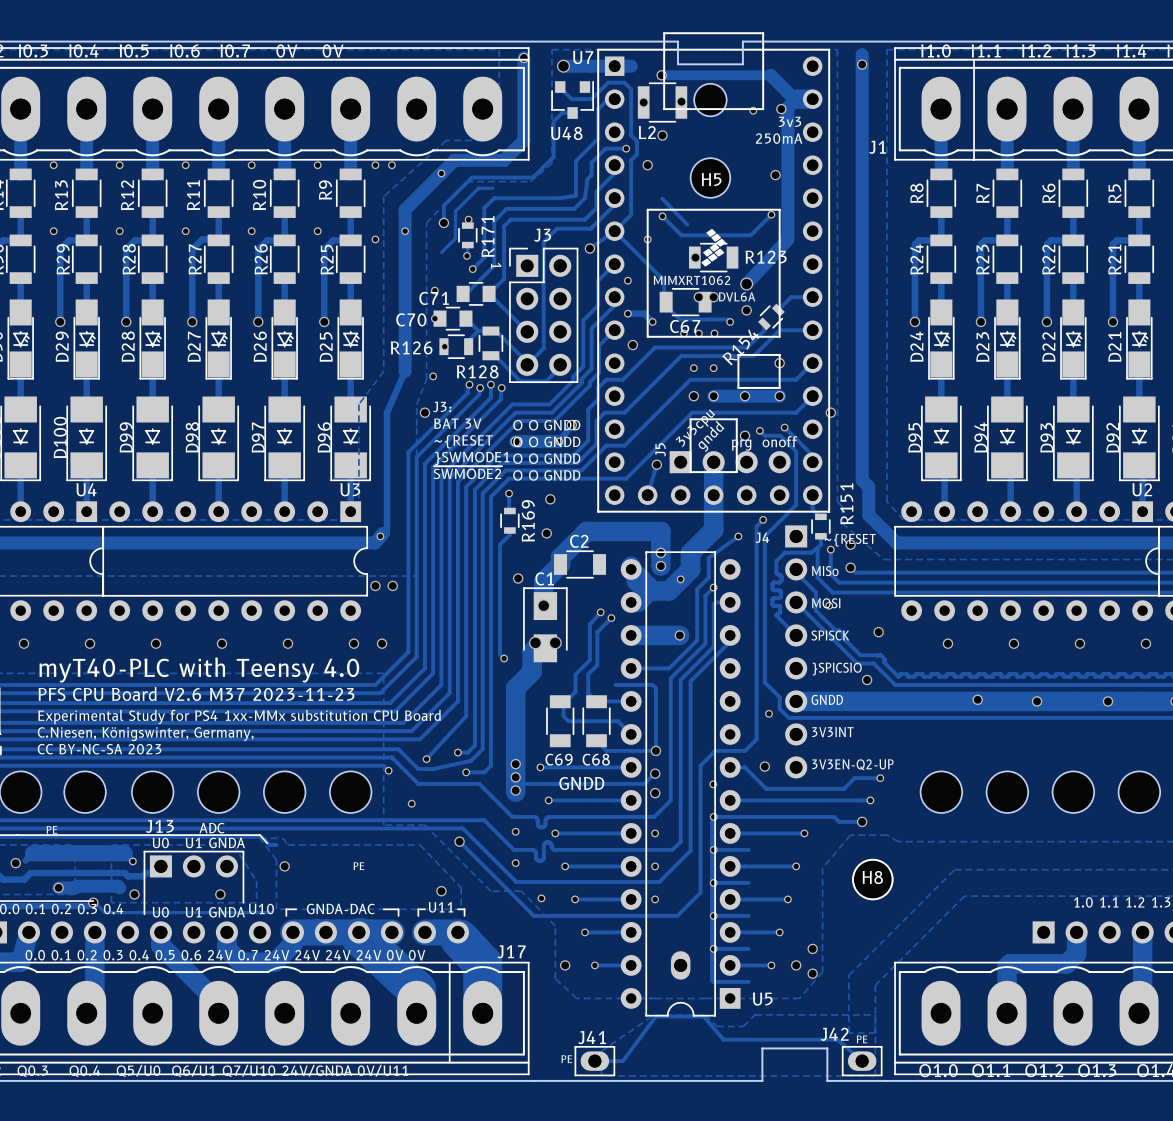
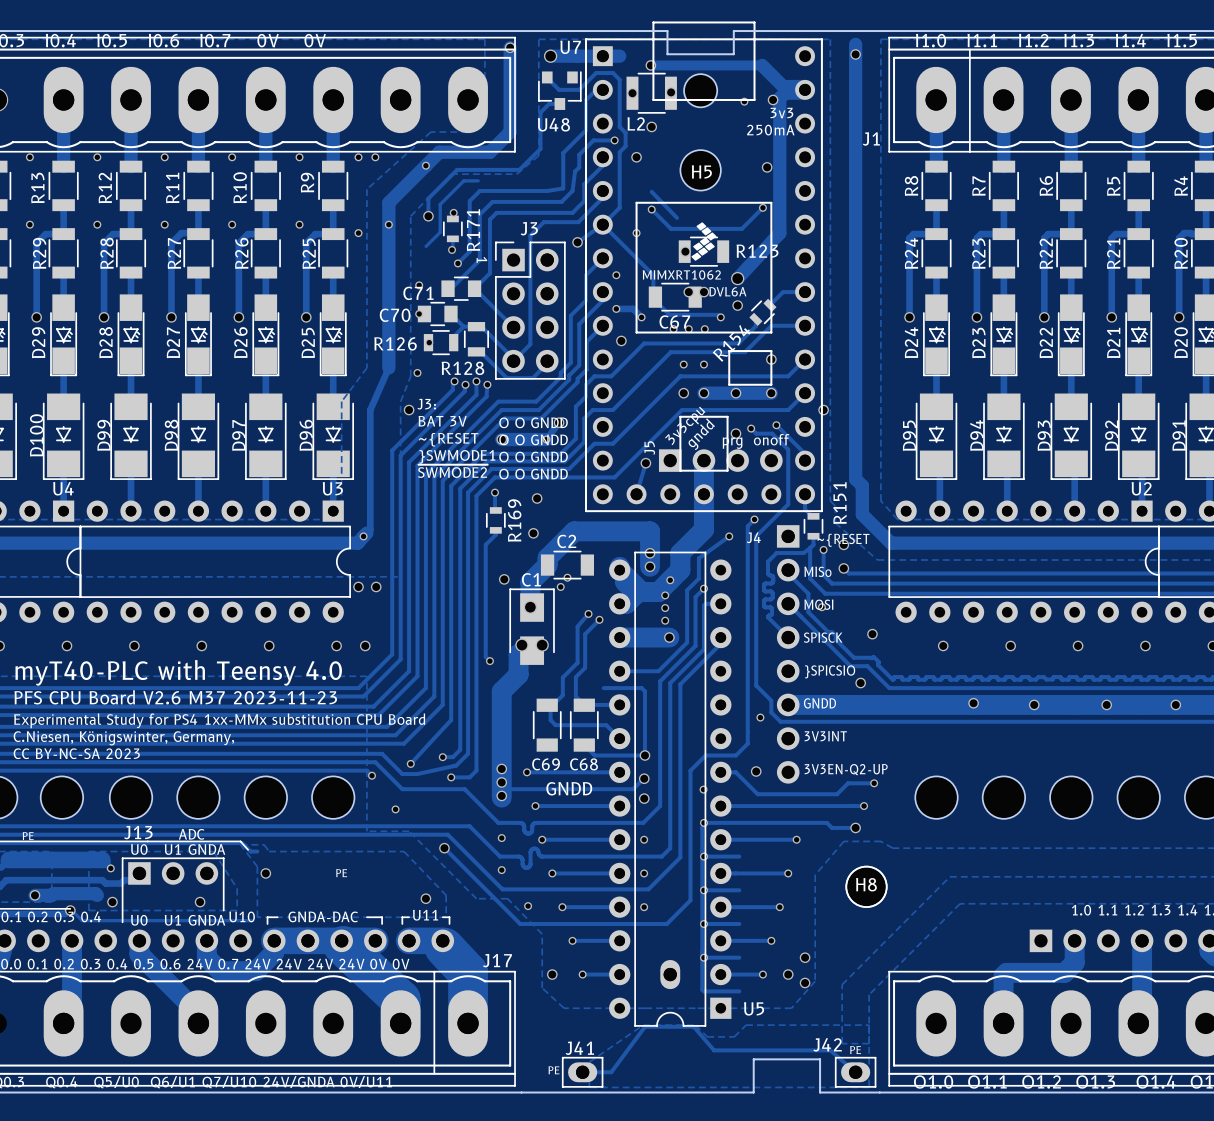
via: none -> (567, 577)
via: none -> (560, 586)
via: none -> (665, 595)
via: none -> (665, 608)
via: none -> (665, 620)

